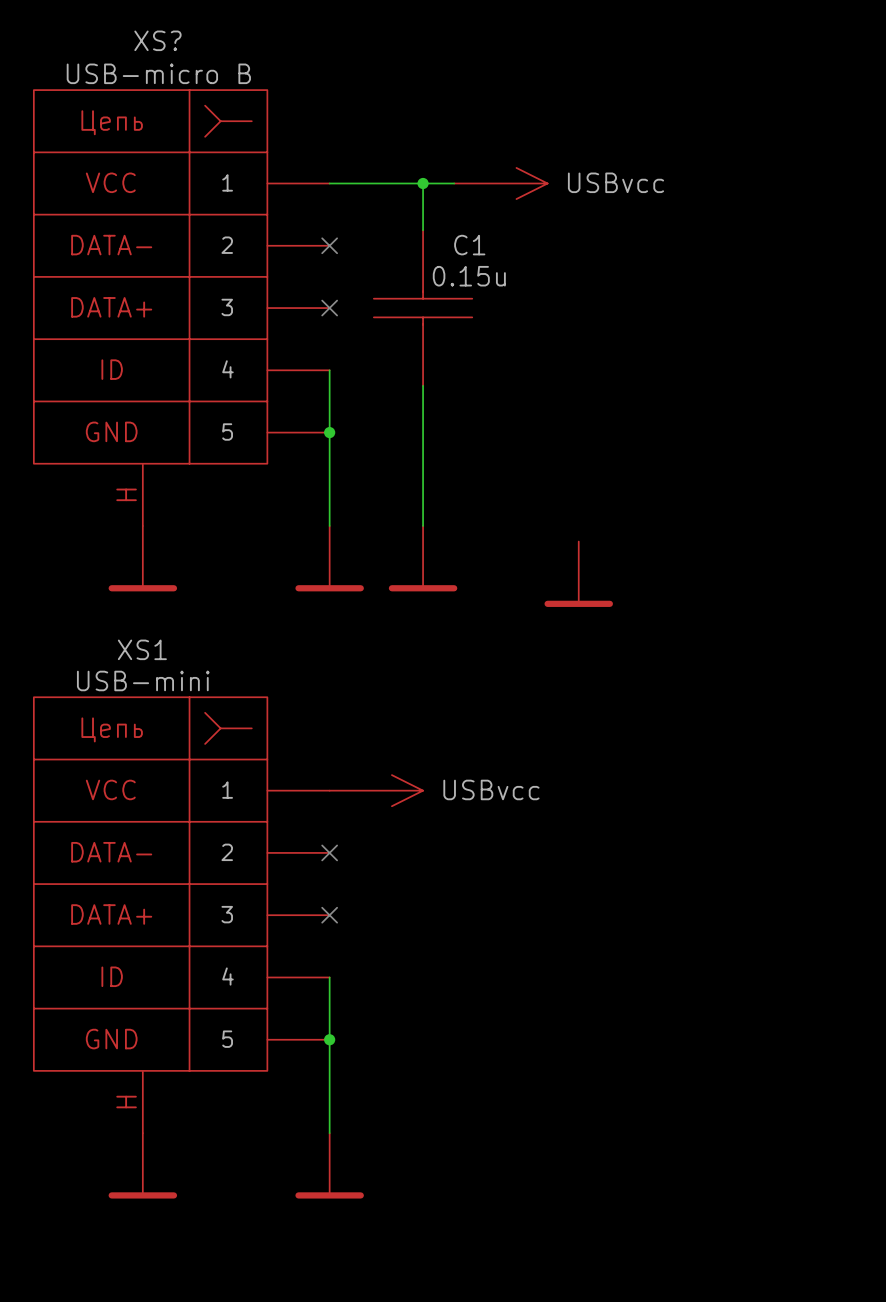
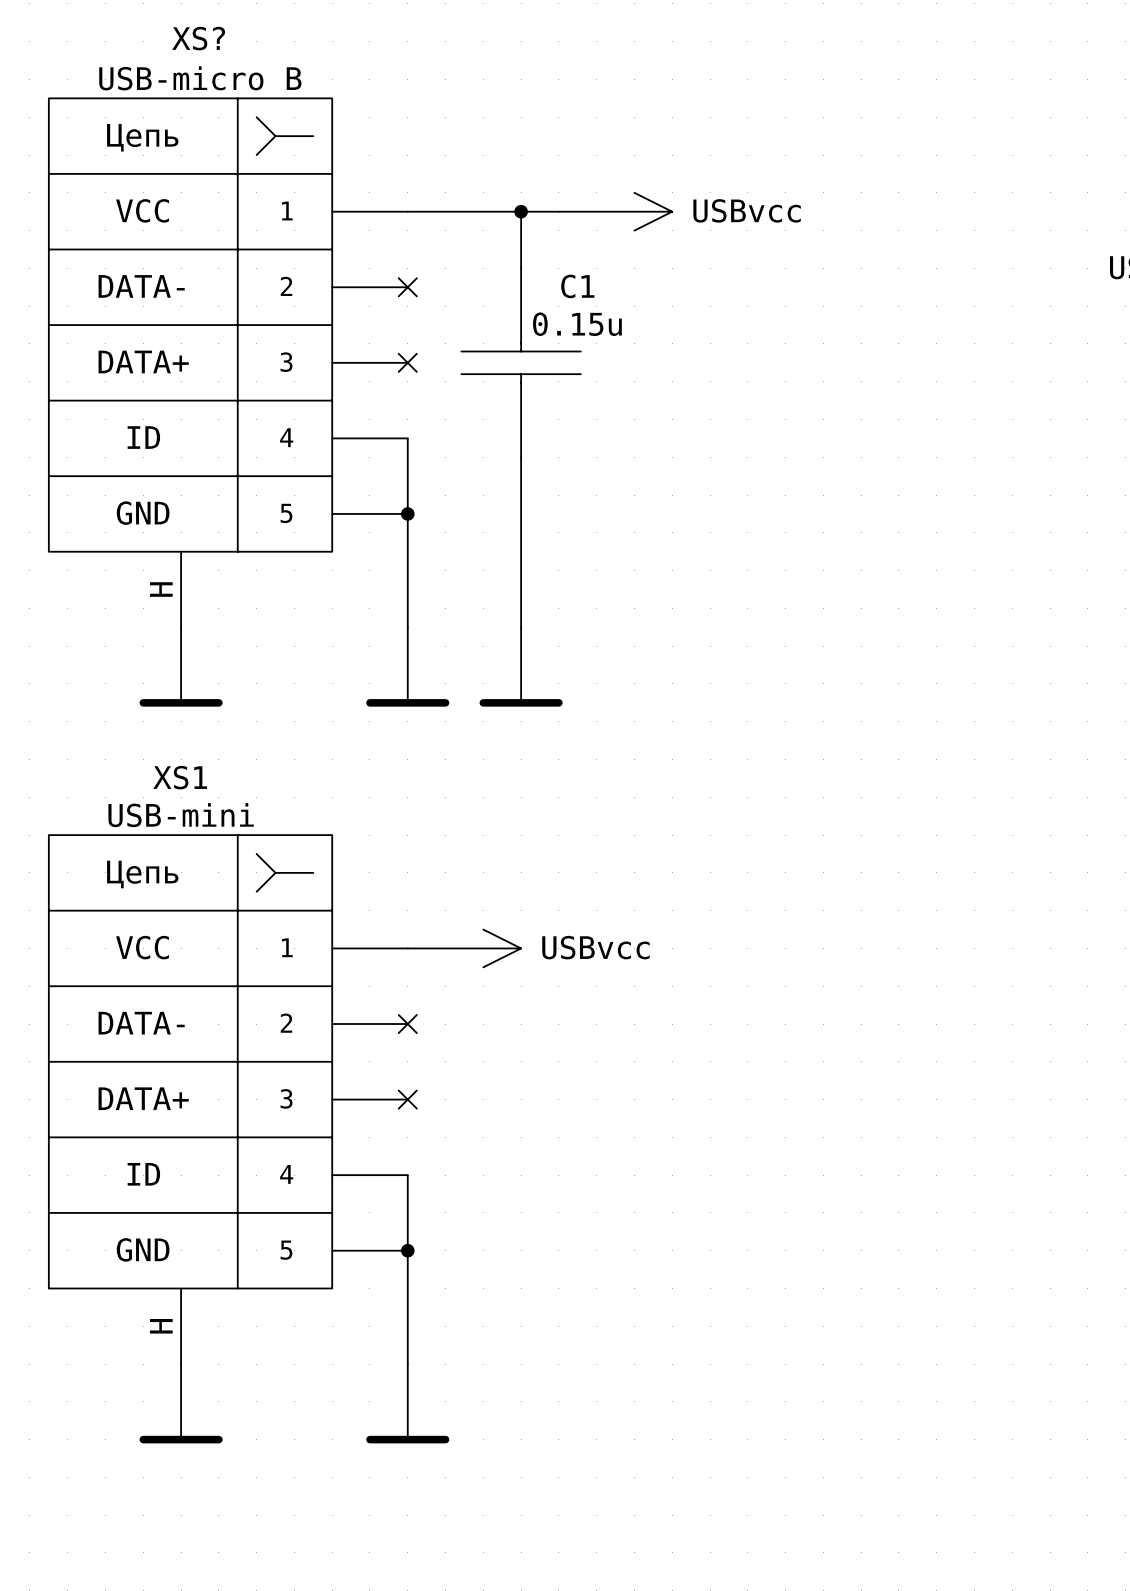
power symbol: (578, 574) -> none

